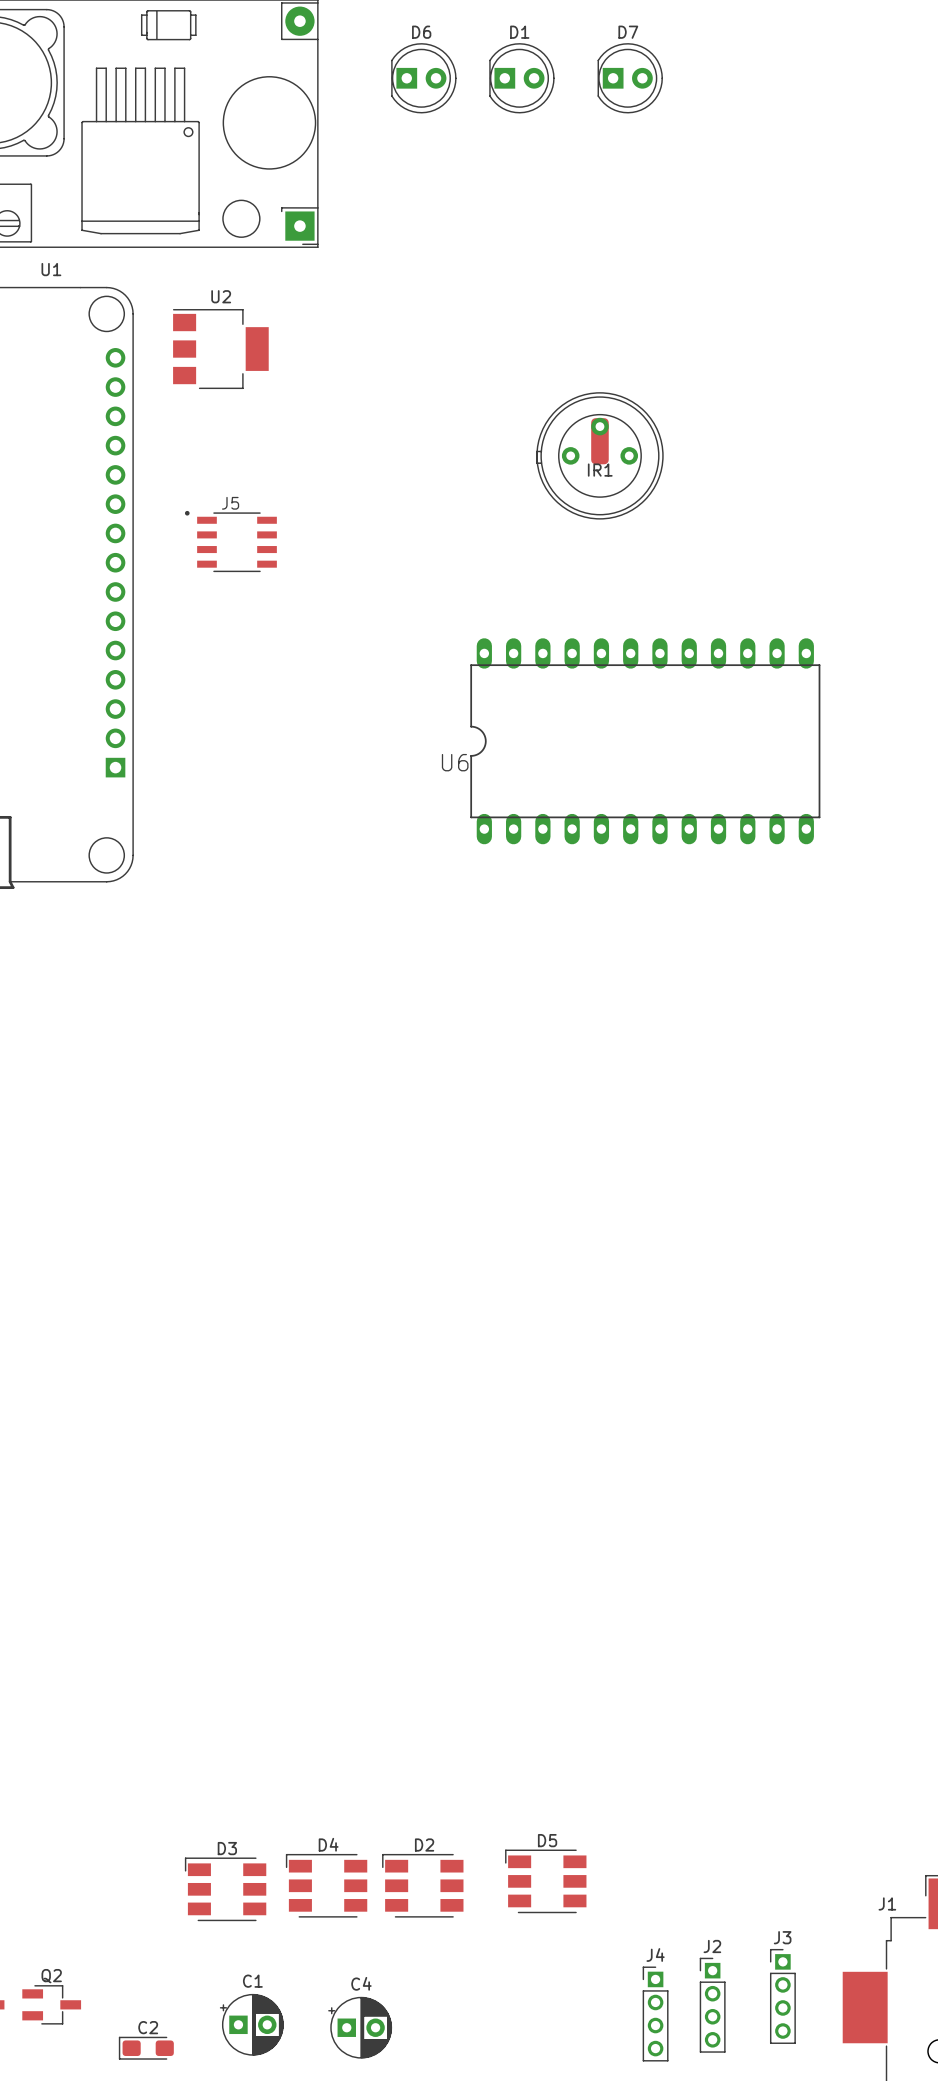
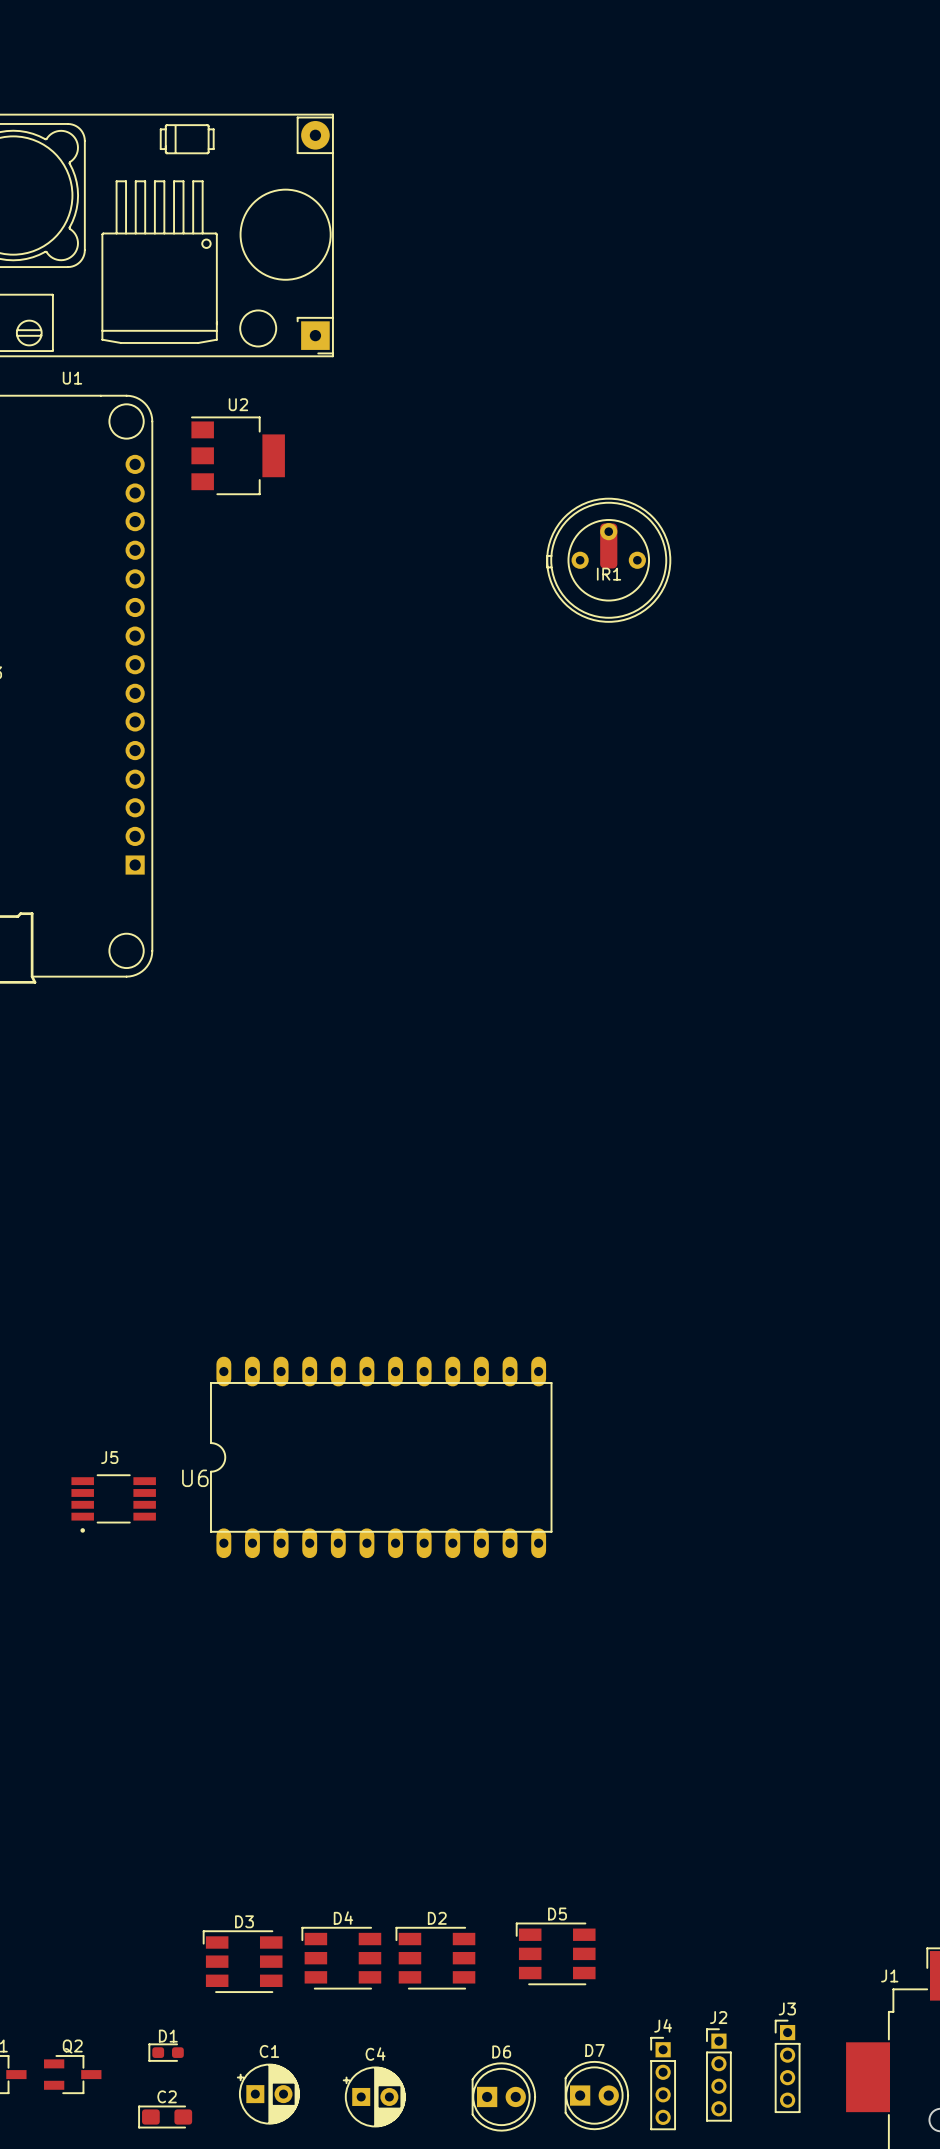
D1 name position: D1 (519, 32) -> D1 (168, 2036)
D1 footprint: [489, 43, 555, 114] -> [148, 2043, 184, 2062]
D7 footprint: [597, 43, 663, 114] -> [564, 2061, 629, 2130]
D6 position: (423, 78) -> (503, 2096)
J5 footprint: [184, 510, 277, 573] -> [71, 1474, 156, 1533]
U6 position: (645, 741) -> (381, 1457)

